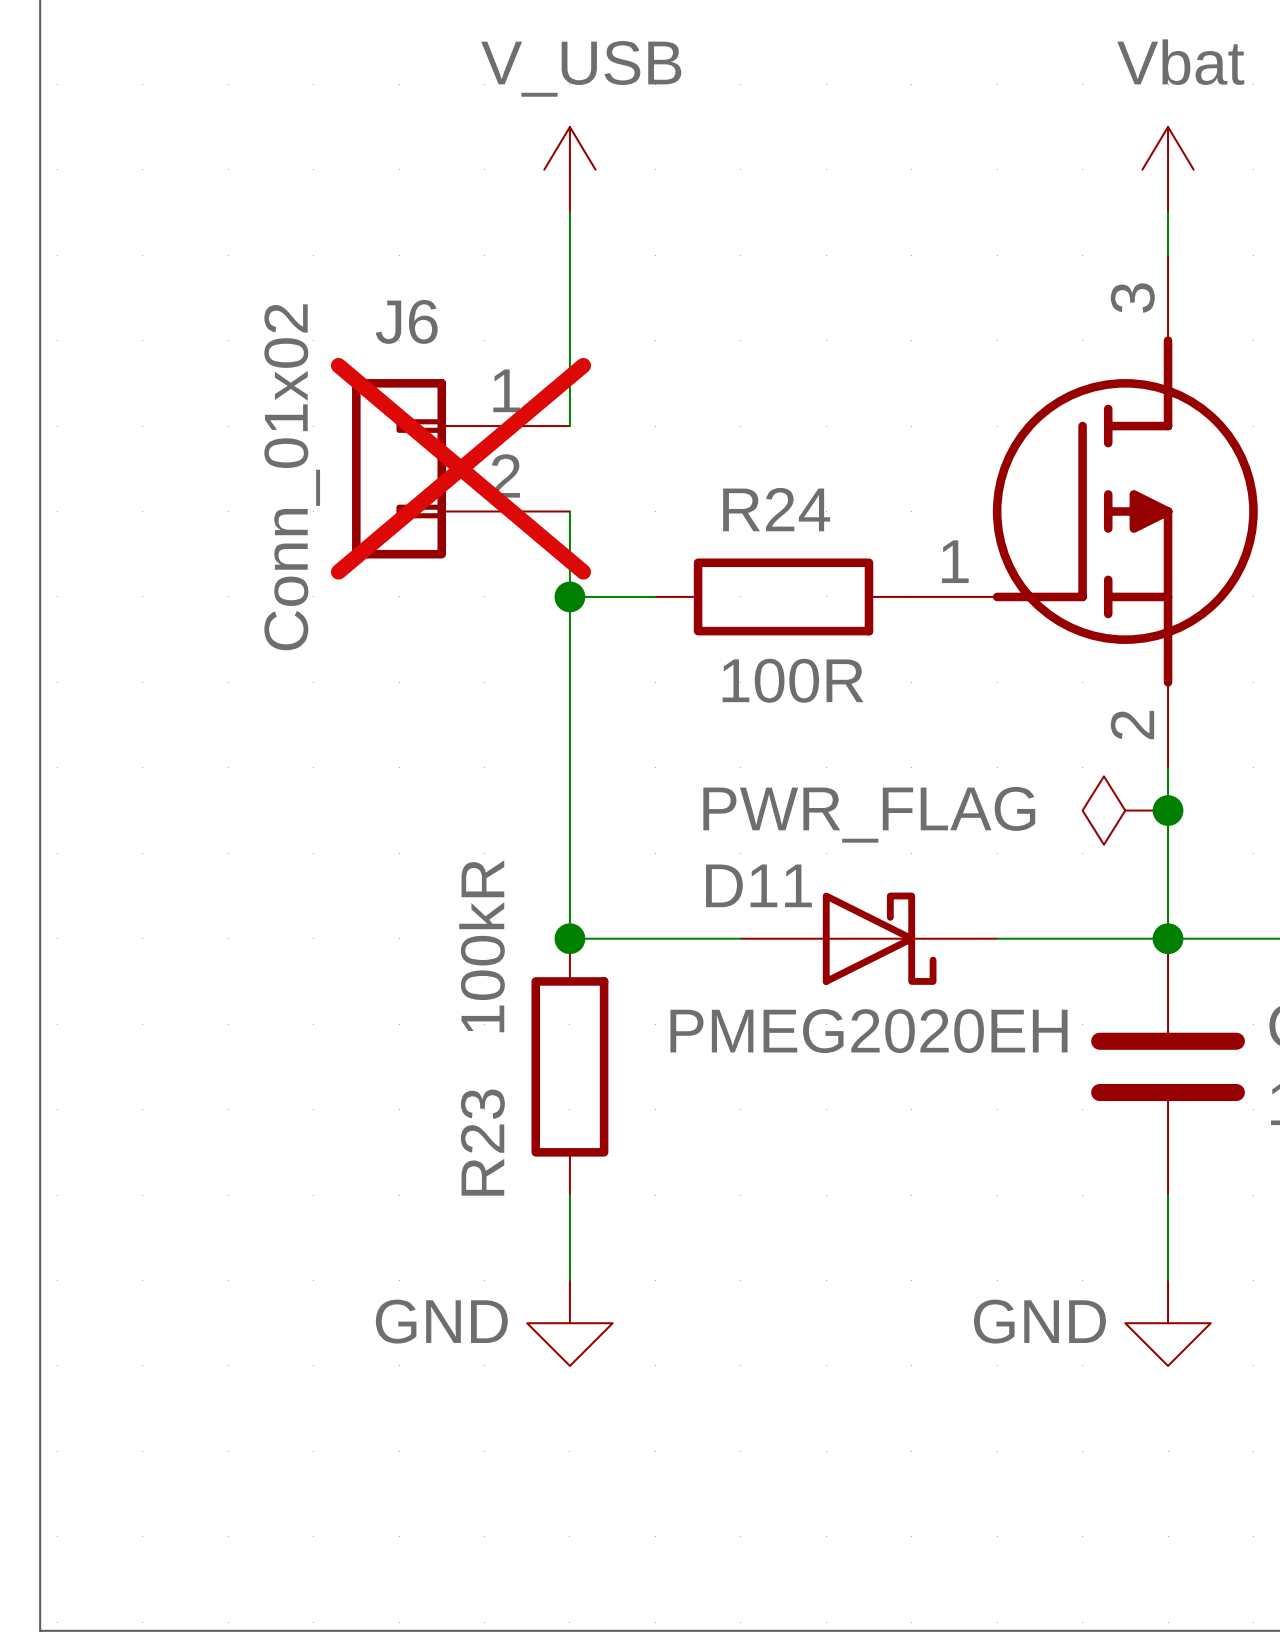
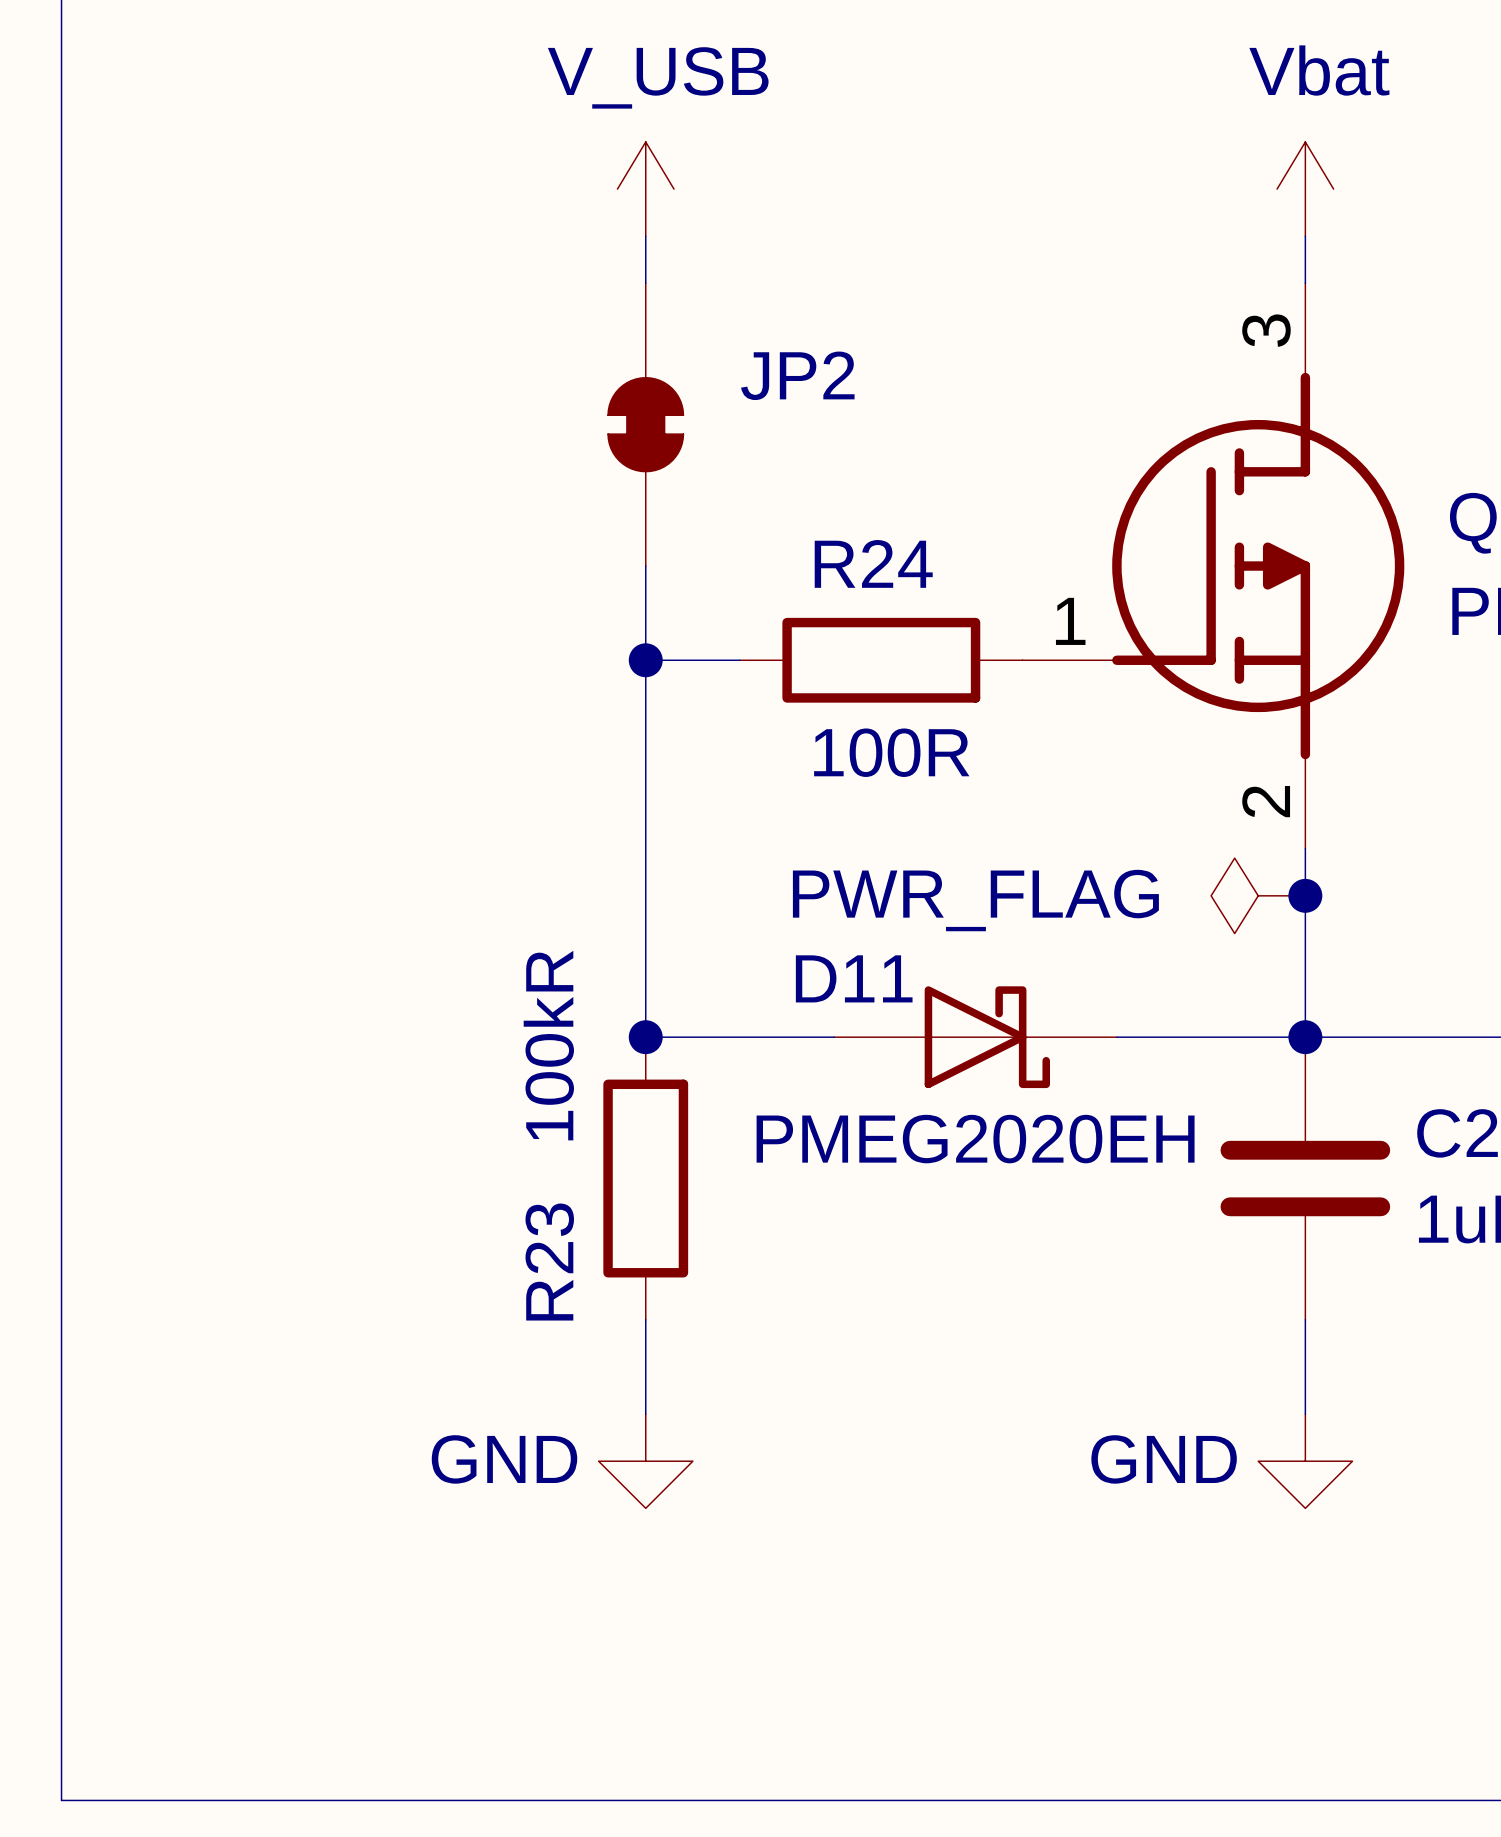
JP2: none -> (645, 424)
J6: Conn_01x02 (460, 468) -> none

